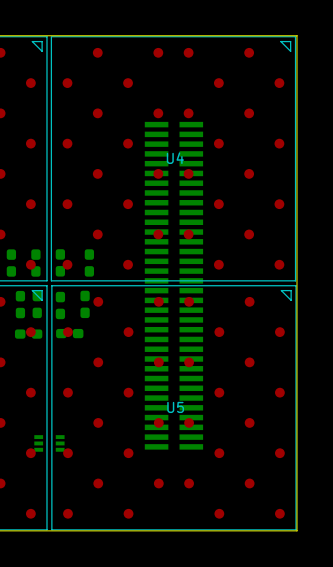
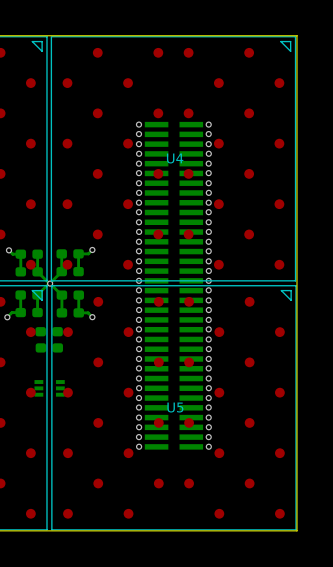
via: none -> (138, 124)
via: none -> (208, 124)
via: none -> (138, 134)
via: none -> (208, 134)
via: none -> (138, 144)
via: none -> (208, 144)
via: none -> (139, 153)
via: none -> (208, 153)
via: none -> (138, 163)
via: none -> (208, 163)
via: none -> (138, 173)
via: none -> (208, 173)
via: none -> (138, 183)
via: none -> (208, 183)
via: none -> (139, 192)
via: none -> (208, 192)
via: none -> (138, 202)
via: none -> (208, 202)
via: none -> (138, 212)
via: none -> (208, 212)
via: none -> (138, 222)
via: none -> (208, 222)
via: none -> (139, 231)
via: none -> (208, 231)
via: none -> (138, 241)
via: none -> (208, 241)
bottom track: none -> (92, 249) (88, 253) (78, 253) (78, 271)
via: none -> (92, 249)
bottom track: none -> (9, 250) (12, 254) (20, 254) (20, 271)
via: none -> (9, 250)
via: none -> (138, 251)
via: none -> (208, 251)
bottom track: none -> (61, 253) (61, 271) (50, 283)
part: none -> (70, 253)
part: none -> (29, 254)
bottom track: none -> (37, 254) (37, 271) (49, 283)
via: none -> (138, 261)
via: none -> (208, 261)
part: (60, 262) -> none
part: (89, 262) -> none
part: (11, 263) -> none
part: (35, 263) -> none
via: none -> (139, 270)
via: none -> (208, 270)
part: none -> (29, 271)
part: none -> (70, 271)
via: none -> (138, 280)
via: none -> (208, 280)
via: none -> (50, 283)
via: none -> (138, 290)
via: none -> (208, 290)
bottom track: none -> (20, 295) (20, 312) (12, 312) (7, 317)
part: none -> (29, 295)
part: none -> (70, 295)
bottom track: none -> (78, 295) (78, 312) (88, 312) (92, 317)
via: none -> (138, 300)
via: none -> (208, 300)
part: (20, 304) -> none
part: (37, 304) -> none
part: (85, 304) -> none
part: (60, 305) -> none
via: none -> (139, 310)
via: none -> (208, 310)
part: none -> (29, 312)
bottom track: none -> (37, 312) (37, 295) (50, 283) (61, 295) (61, 312)
part: none -> (70, 312)
via: none -> (7, 317)
via: none -> (92, 317)
via: none -> (138, 319)
via: none -> (208, 319)
via: none -> (138, 329)
via: none -> (208, 329)
part: none -> (49, 331)
part: (69, 333) -> none
part: (28, 334) -> none
via: none -> (138, 339)
via: none -> (208, 339)
part: none -> (49, 347)
via: none -> (139, 349)
via: none -> (208, 349)
via: none -> (138, 358)
via: none -> (208, 358)
via: none -> (138, 368)
via: none -> (208, 368)
via: none -> (138, 378)
via: none -> (208, 378)
via: none -> (139, 388)
via: none -> (208, 388)
via: none -> (138, 398)
via: none -> (208, 398)
via: none -> (138, 407)
via: none -> (208, 407)
via: none -> (138, 417)
via: none -> (208, 417)
via: none -> (139, 427)
via: none -> (208, 427)
via: none -> (138, 437)
via: none -> (208, 437)
part position: (49, 443) -> (49, 388)
via: none -> (139, 446)
via: none -> (208, 446)

